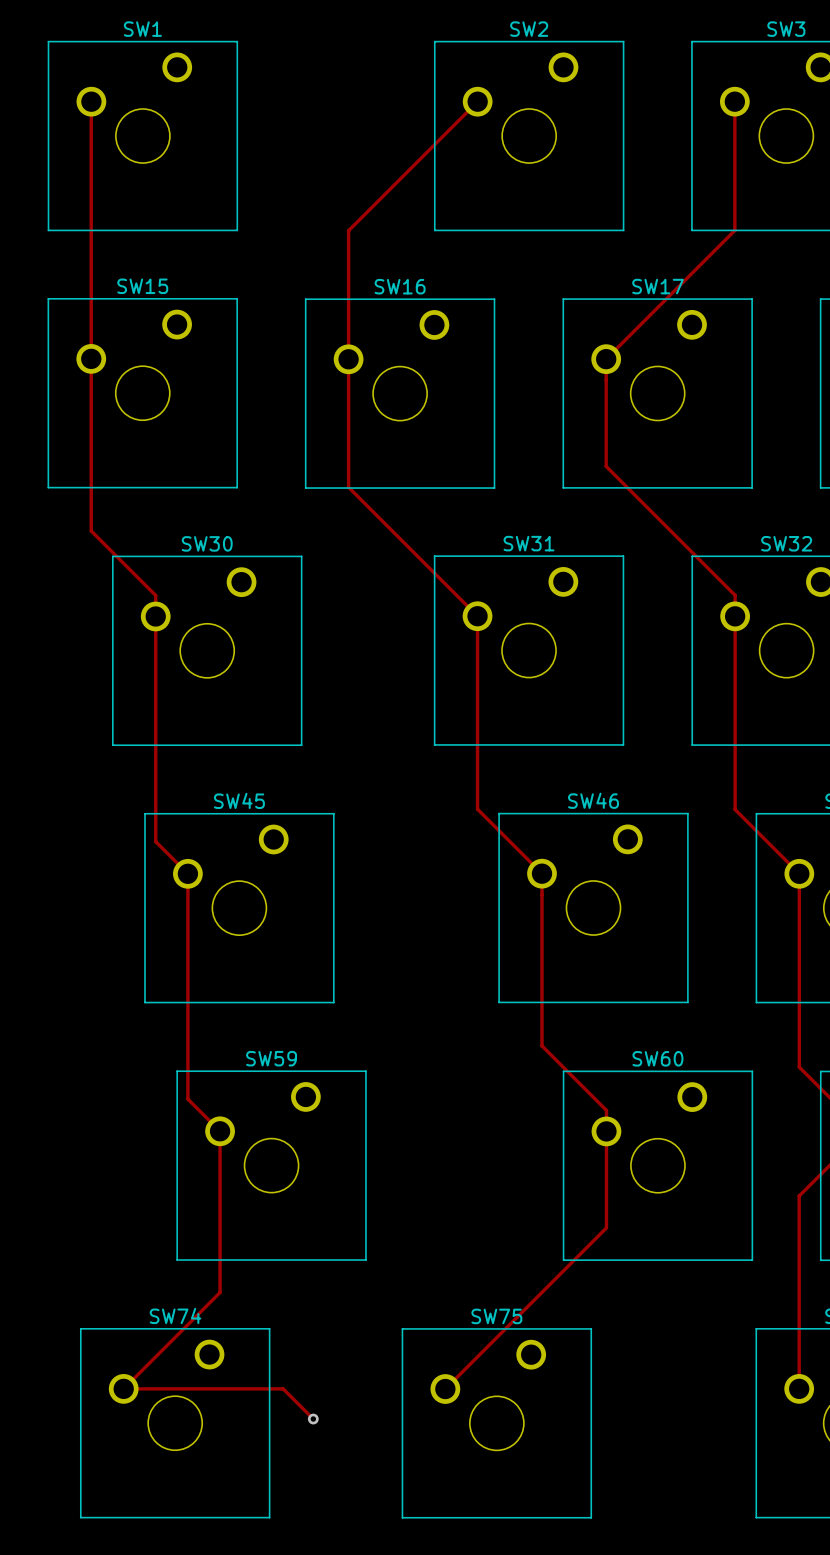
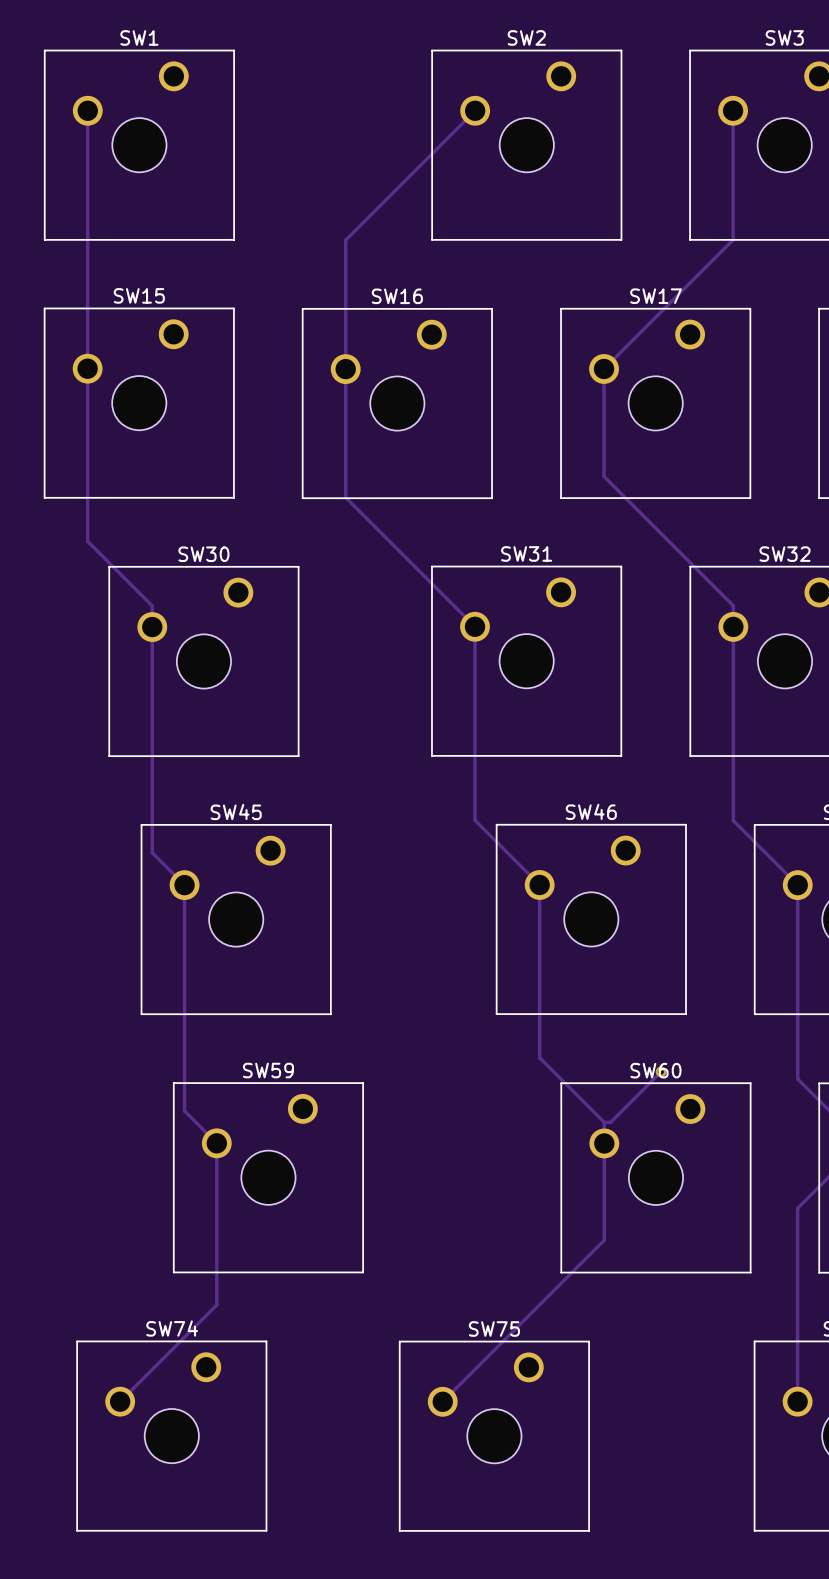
track: none -> (661, 1071) (610, 1122) (604, 1122)
via: none -> (661, 1071)
track: (123, 1388) (283, 1388) (313, 1419) -> none
via: (313, 1419) -> none

